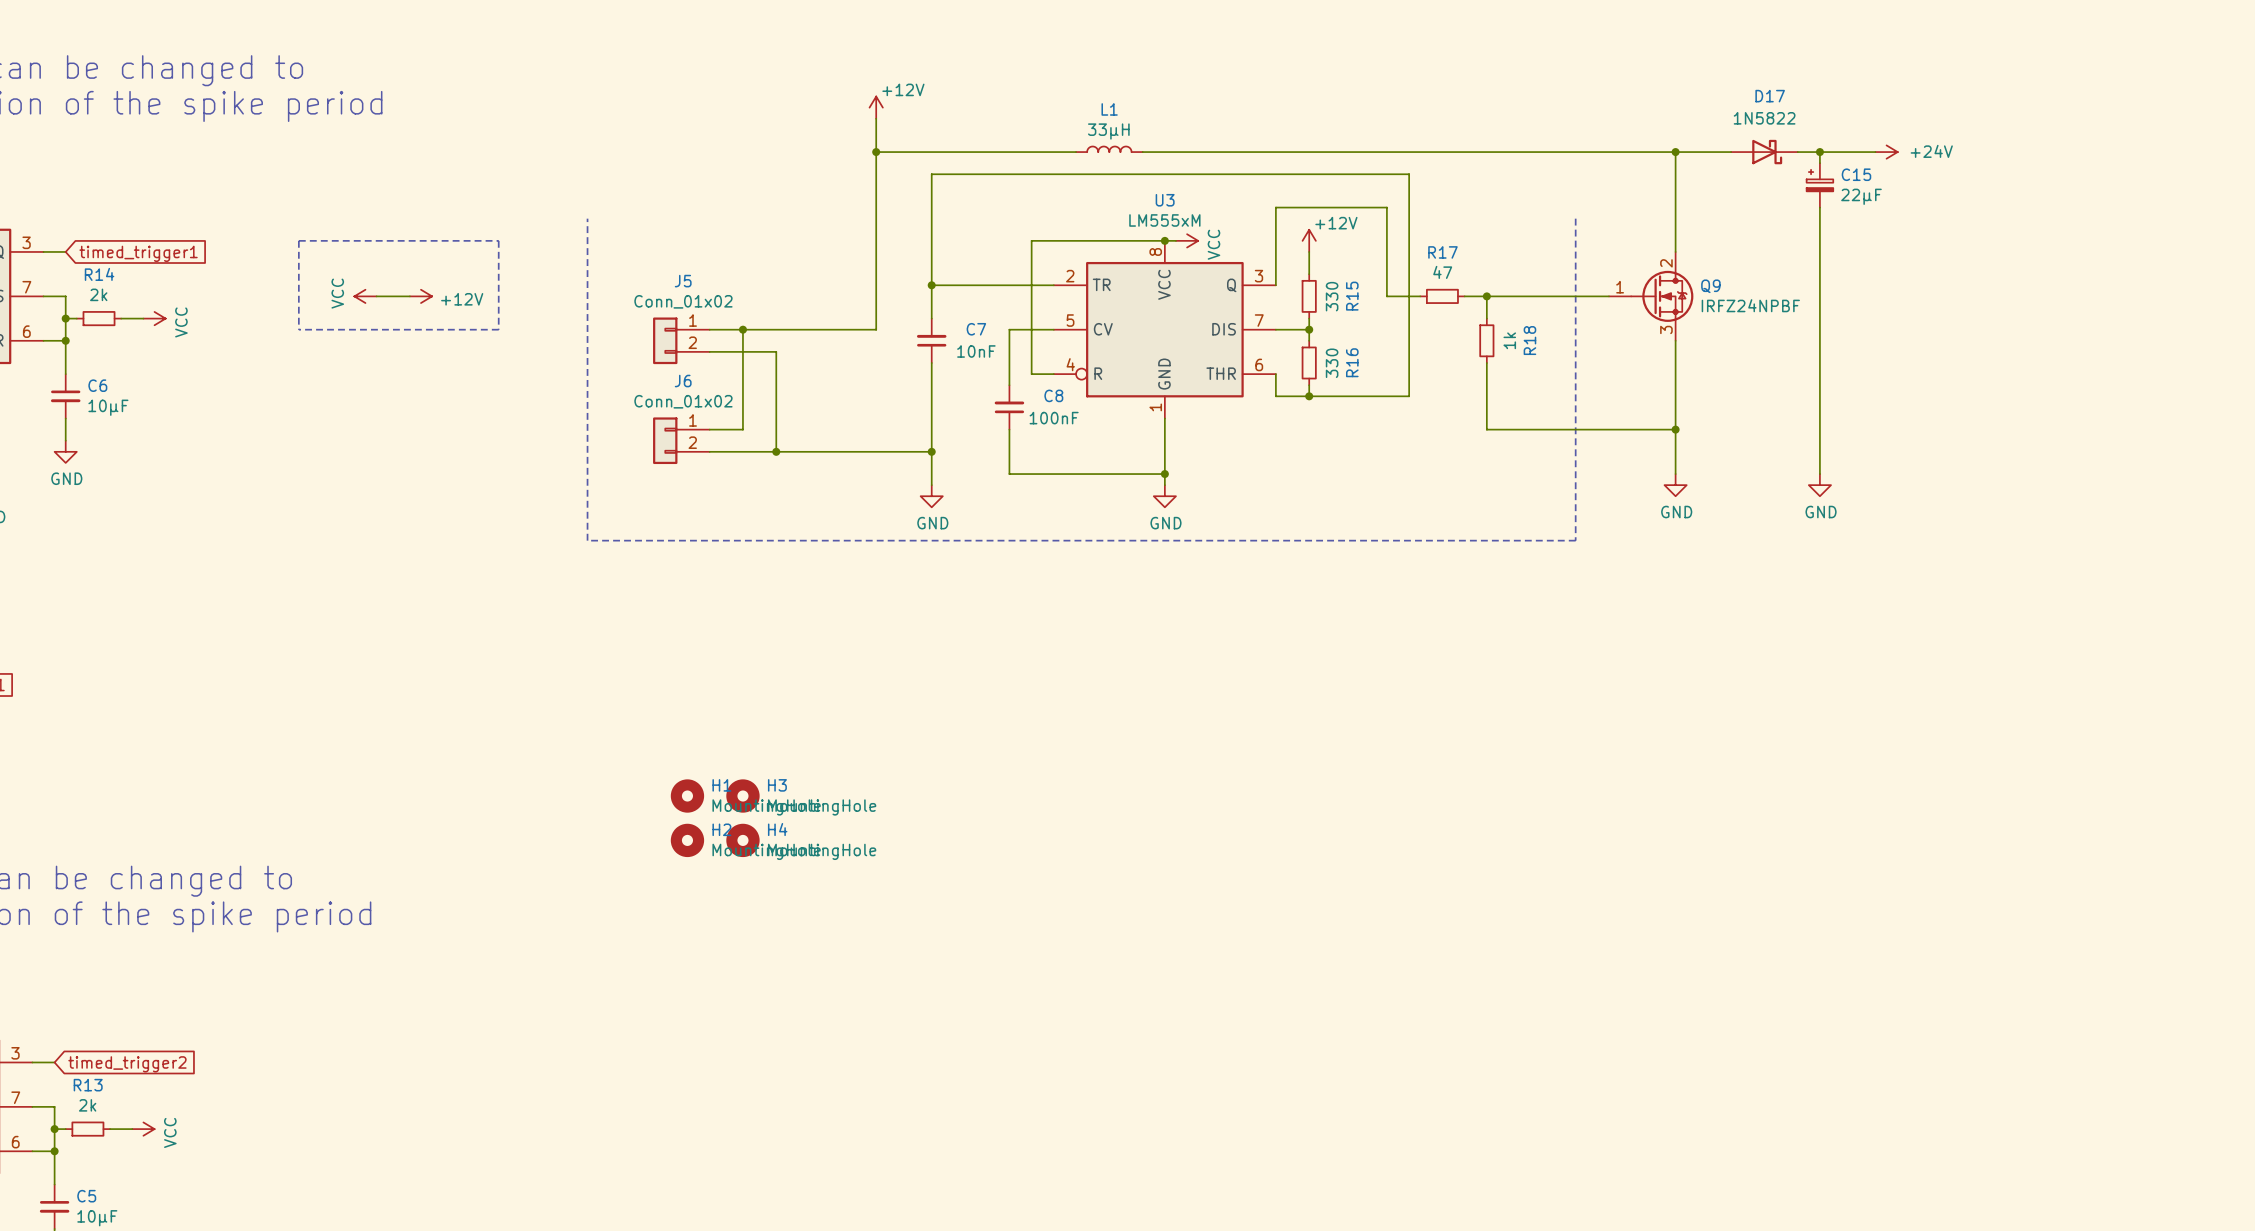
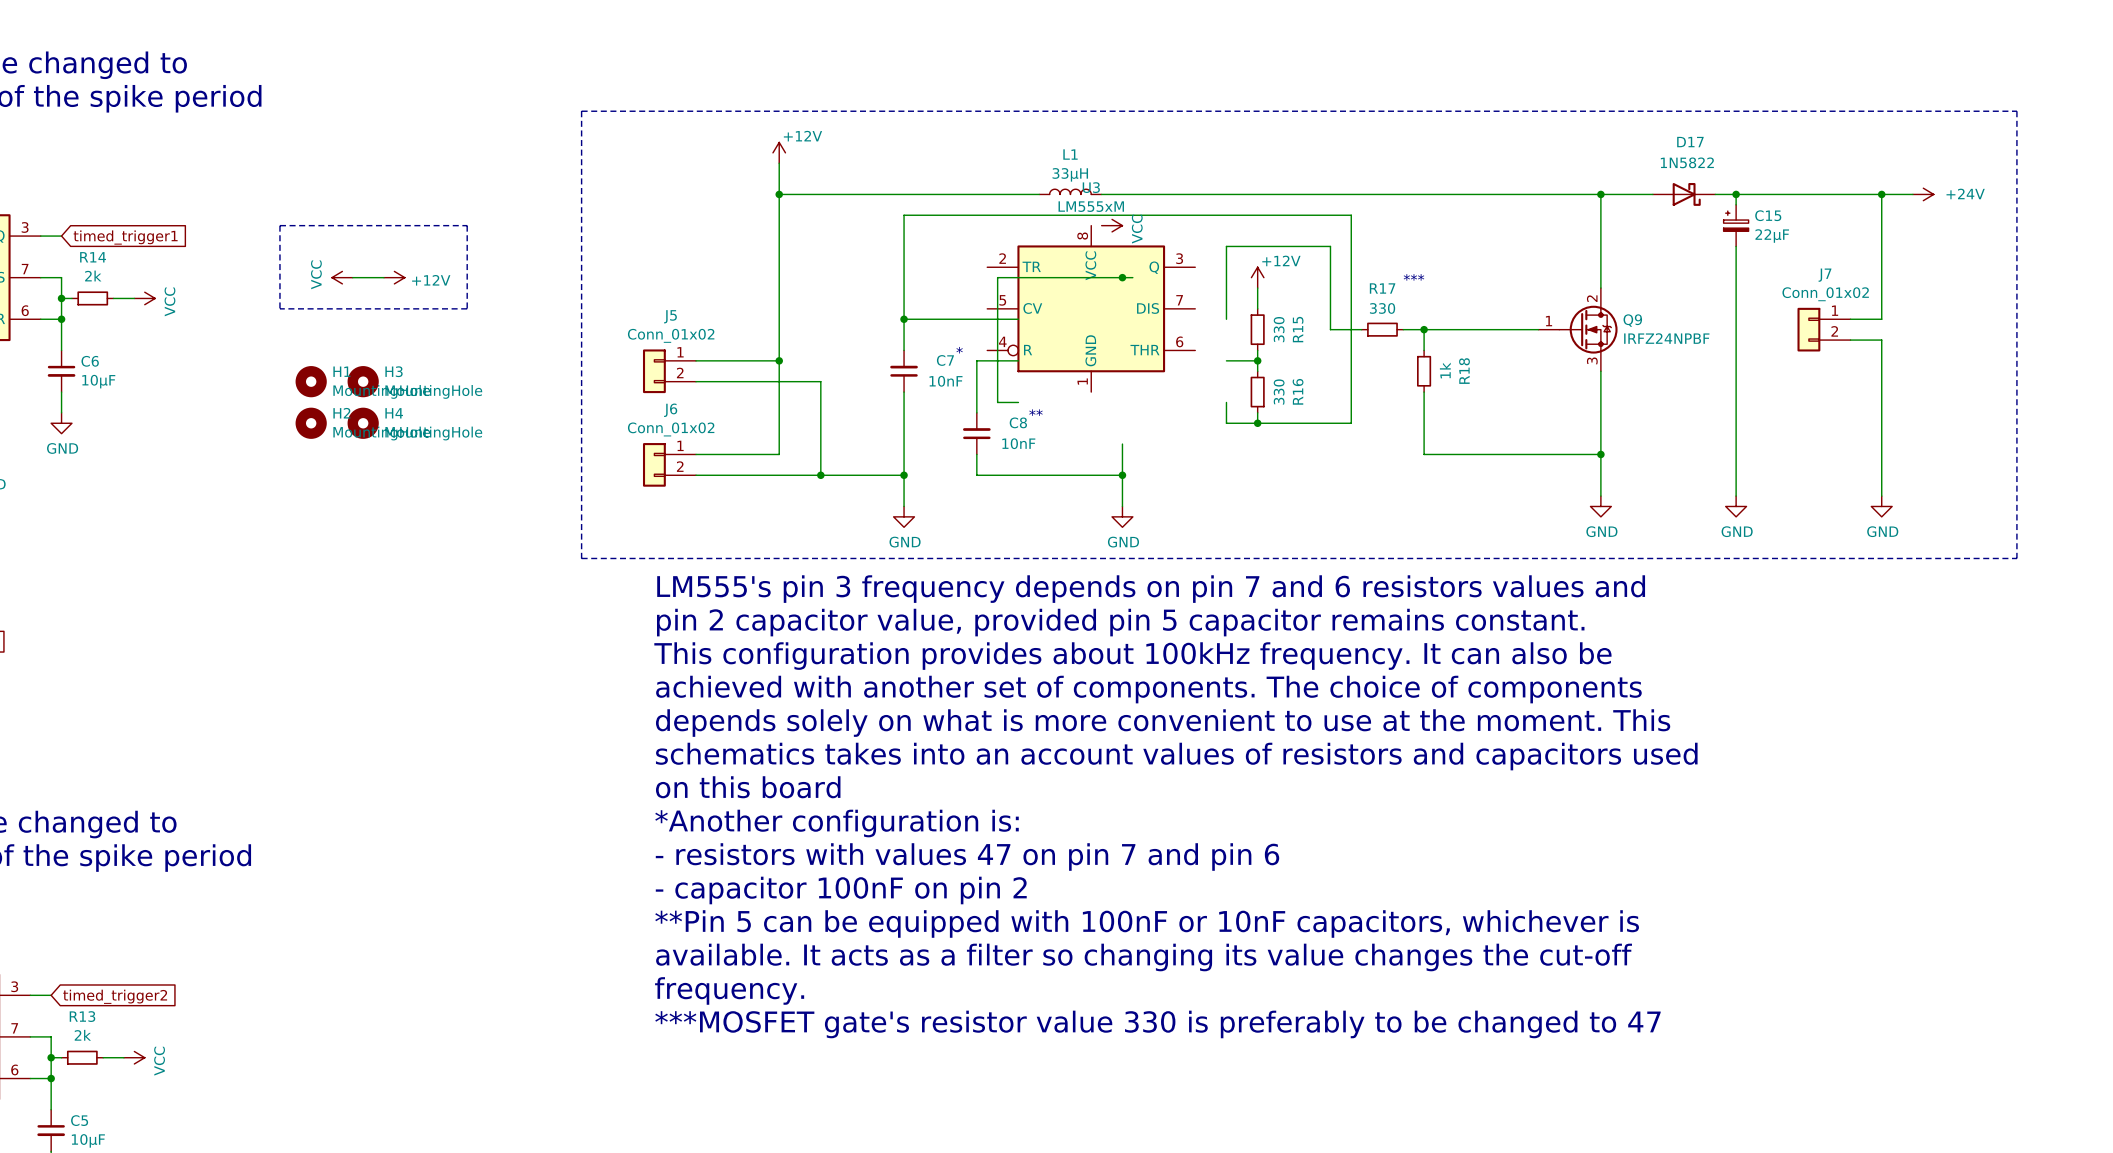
power symbol position: +12V (876, 107) -> +12V (779, 152)
line: none -> (581, 111) (2016, 111) (2016, 558) (581, 558) (581, 111)
wire: (876, 118) (876, 329) (709, 329) -> none
L1 position: (1109, 149) -> (1070, 191)
wire: (876, 152) (1076, 152) -> none
junction: (876, 152) -> none
wire: (1142, 152) (1731, 152) -> none
wire: (1675, 152) (1675, 251) -> (1600, 194) (1600, 288)
junction: (1675, 152) -> none
D17 position: (1764, 152) -> (1684, 194)
wire: (1797, 152) (1875, 152) -> none
wire: (1819, 152) (1819, 163) -> (1736, 194) (1736, 204)
junction: (1819, 152) -> none
power symbol position: +24V (1886, 152) -> +24V (1923, 194)
wire: none -> (779, 163) (779, 454) (696, 454)
C15 position: (1819, 185) -> (1736, 225)
wire: none -> (779, 194) (1039, 194)
junction: none -> (779, 194)
wire: (1275, 207) (1275, 285) -> (1195, 194) (1101, 194)
wire: (1386, 207) (1386, 296) (1420, 296) -> (1299, 194) (1652, 194)
junction: none -> (1600, 194)
wire: (1819, 207) (1819, 474) -> (1736, 246) (1736, 496)
wire: none -> (1715, 194) (1912, 194)
junction: none -> (1736, 194)
wire: none -> (1881, 194) (1881, 319) (1850, 319)
junction: none -> (1881, 194)
line: (587, 218) (587, 540) (1575, 540) (1575, 218) -> none
junction: (1164, 240) -> none
wire: (1175, 240) (1031, 240) (1031, 374) (1053, 374) -> (1132, 277) (997, 277) (997, 402) (1018, 402)
power symbol position: +12V (1309, 240) -> +12V (1257, 277)
wire: (1309, 251) (1309, 263) -> (1361, 329) (1330, 329) (1330, 246) (1226, 246)
R17 value: 47 (1442, 272) -> 330 (1382, 308)
wire: none -> (1226, 256) (1226, 298)
wire: (931, 285) (1053, 285) -> (904, 319) (1018, 319)
junction: (931, 285) -> none
text: none -> *** (1413, 277)
junction: none -> (1122, 277)
R15 position: (1309, 296) -> (1257, 329)
R17 position: (1442, 296) -> (1382, 329)
wire: (1464, 296) (1608, 296) -> (1403, 329) (1538, 329)
wire: (1486, 296) (1486, 318) -> (1424, 329) (1424, 350)
junction: (1486, 296) -> none
Q9 position: (1651, 296) -> (1578, 329)
wire: none -> (1257, 288) (1257, 308)
wire: (931, 318) (931, 174) (1409, 174) (1409, 396) (1275, 396) (1275, 374) -> (904, 350) (904, 215) (1351, 215) (1351, 423) (1226, 423) (1226, 402)
wire: (742, 329) (742, 429) (709, 429) -> none
junction: (742, 329) -> none
wire: (1053, 329) (1009, 329) (1009, 385) -> (1018, 360) (976, 360) (976, 412)
wire: (1275, 329) (1309, 329) -> none
junction: (1309, 329) -> none
J5 position: (681, 340) -> (669, 371)
C7 position: (931, 340) -> (904, 371)
junction: none -> (904, 319)
R18 position: (1486, 340) -> (1424, 371)
wire: (1675, 340) (1675, 474) -> (1600, 371) (1600, 496)
wire: (709, 351) (776, 351) (776, 451) -> none
junction: none -> (1424, 329)
J7: none -> Conn_01x02 (1824, 329)
wire: (931, 363) (931, 485) -> (904, 392) (904, 506)
R16 position: (1309, 363) -> (1257, 392)
wire: (1486, 363) (1486, 429) (1675, 429) -> (1424, 392) (1424, 454) (1600, 454)
wire: none -> (1850, 340) (1881, 340) (1881, 496)
text: none -> * (959, 350)
wire: none -> (1257, 350) (1257, 371)
wire: none -> (696, 360) (779, 360)
junction: none -> (779, 360)
wire: (1309, 385) (1309, 396) -> (1226, 360) (1257, 360)
junction: none -> (1257, 360)
junction: (1309, 396) -> none
wire: none -> (696, 381) (820, 381) (820, 475)
C8 position: (1009, 407) -> (976, 433)
C8 value: 100nF (1054, 418) -> 10nF (1018, 443)
wire: (1164, 418) (1164, 485) -> (1122, 444) (1122, 506)
wire: (1009, 429) (1009, 474) (1164, 474) -> none
junction: (1675, 429) -> none
text: none -> ** (1035, 412)
J6 position: (681, 440) -> (669, 464)
wire: none -> (1257, 412) (1257, 423)
wire: (709, 451) (931, 451) -> (696, 475) (904, 475)
junction: (776, 451) -> none
junction: (931, 451) -> none
junction: none -> (1257, 423)
junction position: (1164, 474) -> (1122, 475)
wire: none -> (976, 454) (976, 475) (1122, 475)
power symbol: GND (1675, 485) -> none
junction: none -> (1600, 454)
power symbol: GND (1819, 485) -> none
power symbol position: GND (931, 496) -> GND (904, 516)
power symbol position: GND (1164, 496) -> GND (1122, 516)
junction: none -> (820, 475)
junction: none -> (904, 475)
power symbol: none -> GND (1600, 506)
power symbol: none -> GND (1736, 506)
power symbol: none -> GND (1881, 506)
text: none -> LM555's pin 3 frequency depends on pin 7 and 6 resistors values and (1151, 589)
text: none -> pin 2 capacitor value, provided pin 5 capacitor remains constant. (1120, 622)
text: none -> This configuration provides about 100kHz frequency. It can also be (1132, 656)
text: none -> achieved with another set of components. The choice of components (1148, 689)
text: none -> depends solely on what is more convenient to use at the moment. This (1163, 723)
H1 position: (687, 796) -> (311, 381)
H3 position: (742, 796) -> (363, 381)
text: none -> schematics takes into an account values of resistors and capacitors used (1176, 756)
H2 position: (687, 840) -> (311, 423)
H4 position: (742, 840) -> (363, 423)
text: none -> on this board (748, 787)
text: none -> *Another configuration is: (837, 823)
text: none -> - resistors with values 47 on pin 7 and pin 6 (967, 857)
text: none -> - capacitor 100nF on pin 2 (841, 890)
text: none -> **Pin 5 can be equipped with 100nF or 10nF capacitors, whichever is (1147, 923)
text: none -> available. It acts as a filter so changing its value changes the cut-off (1144, 957)
text: none -> frequency. (729, 990)
text: none -> ***MOSFET gate's resistor value 330 is preferably to be changed to 47 (1157, 1024)

